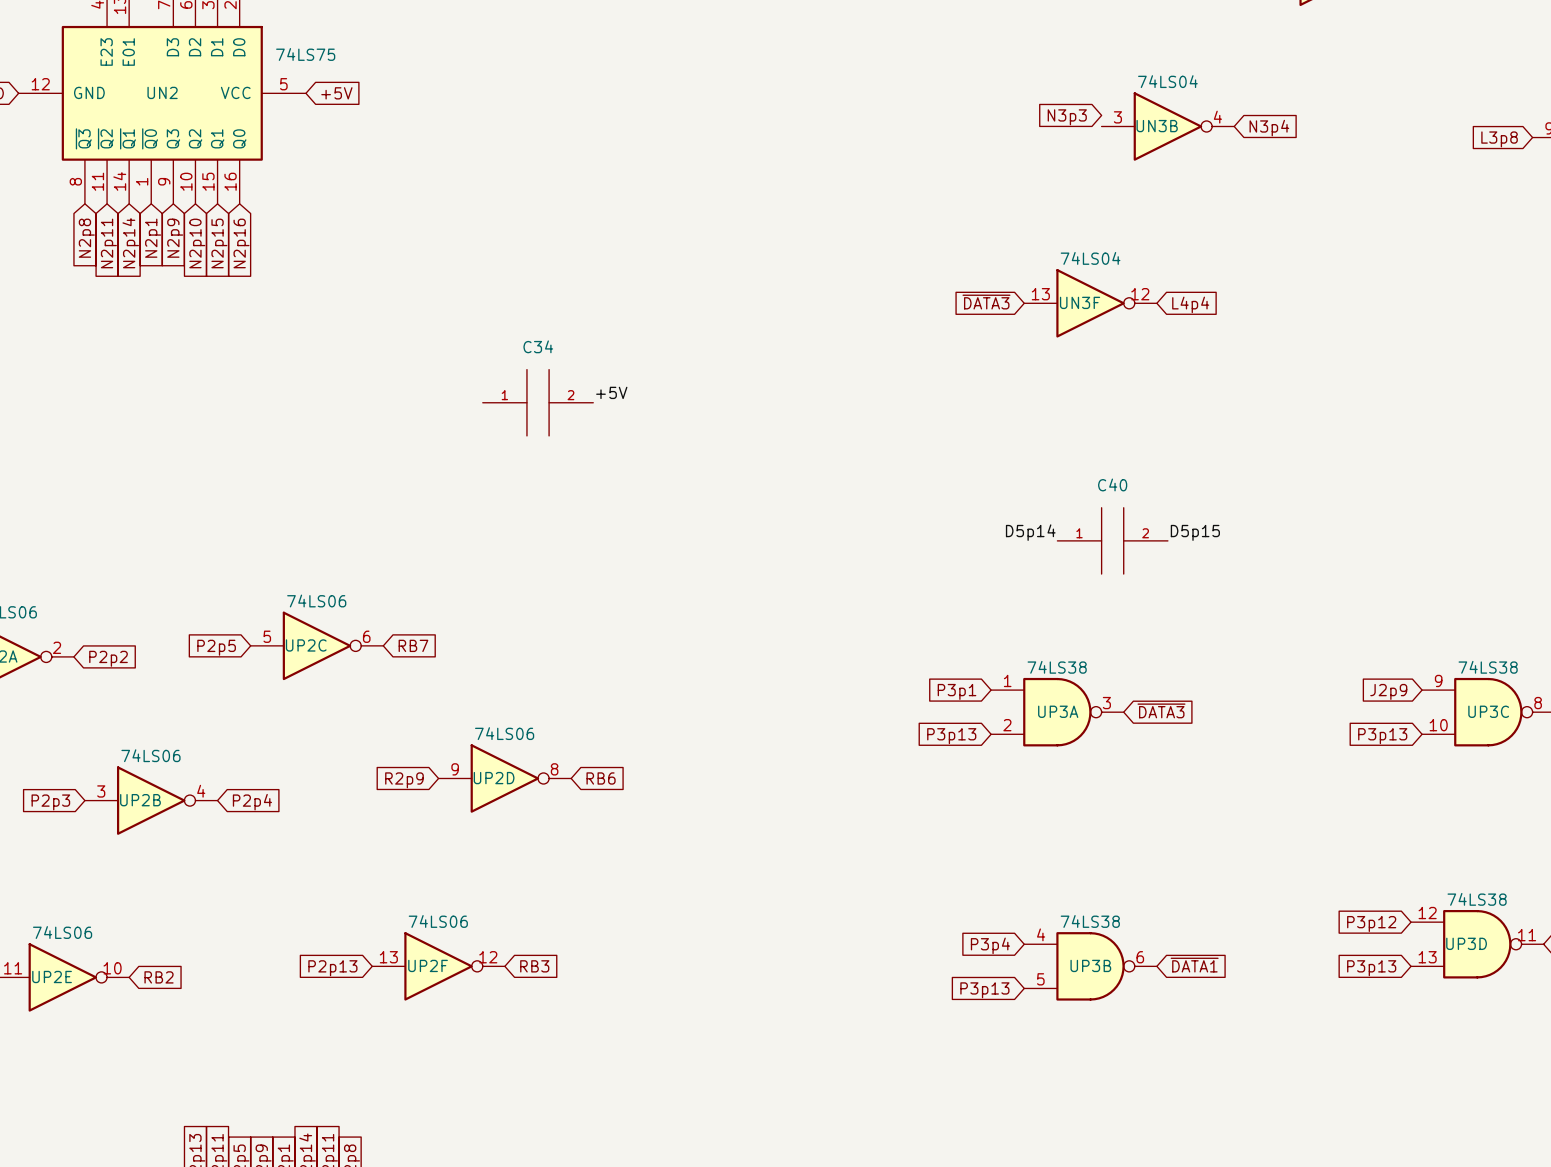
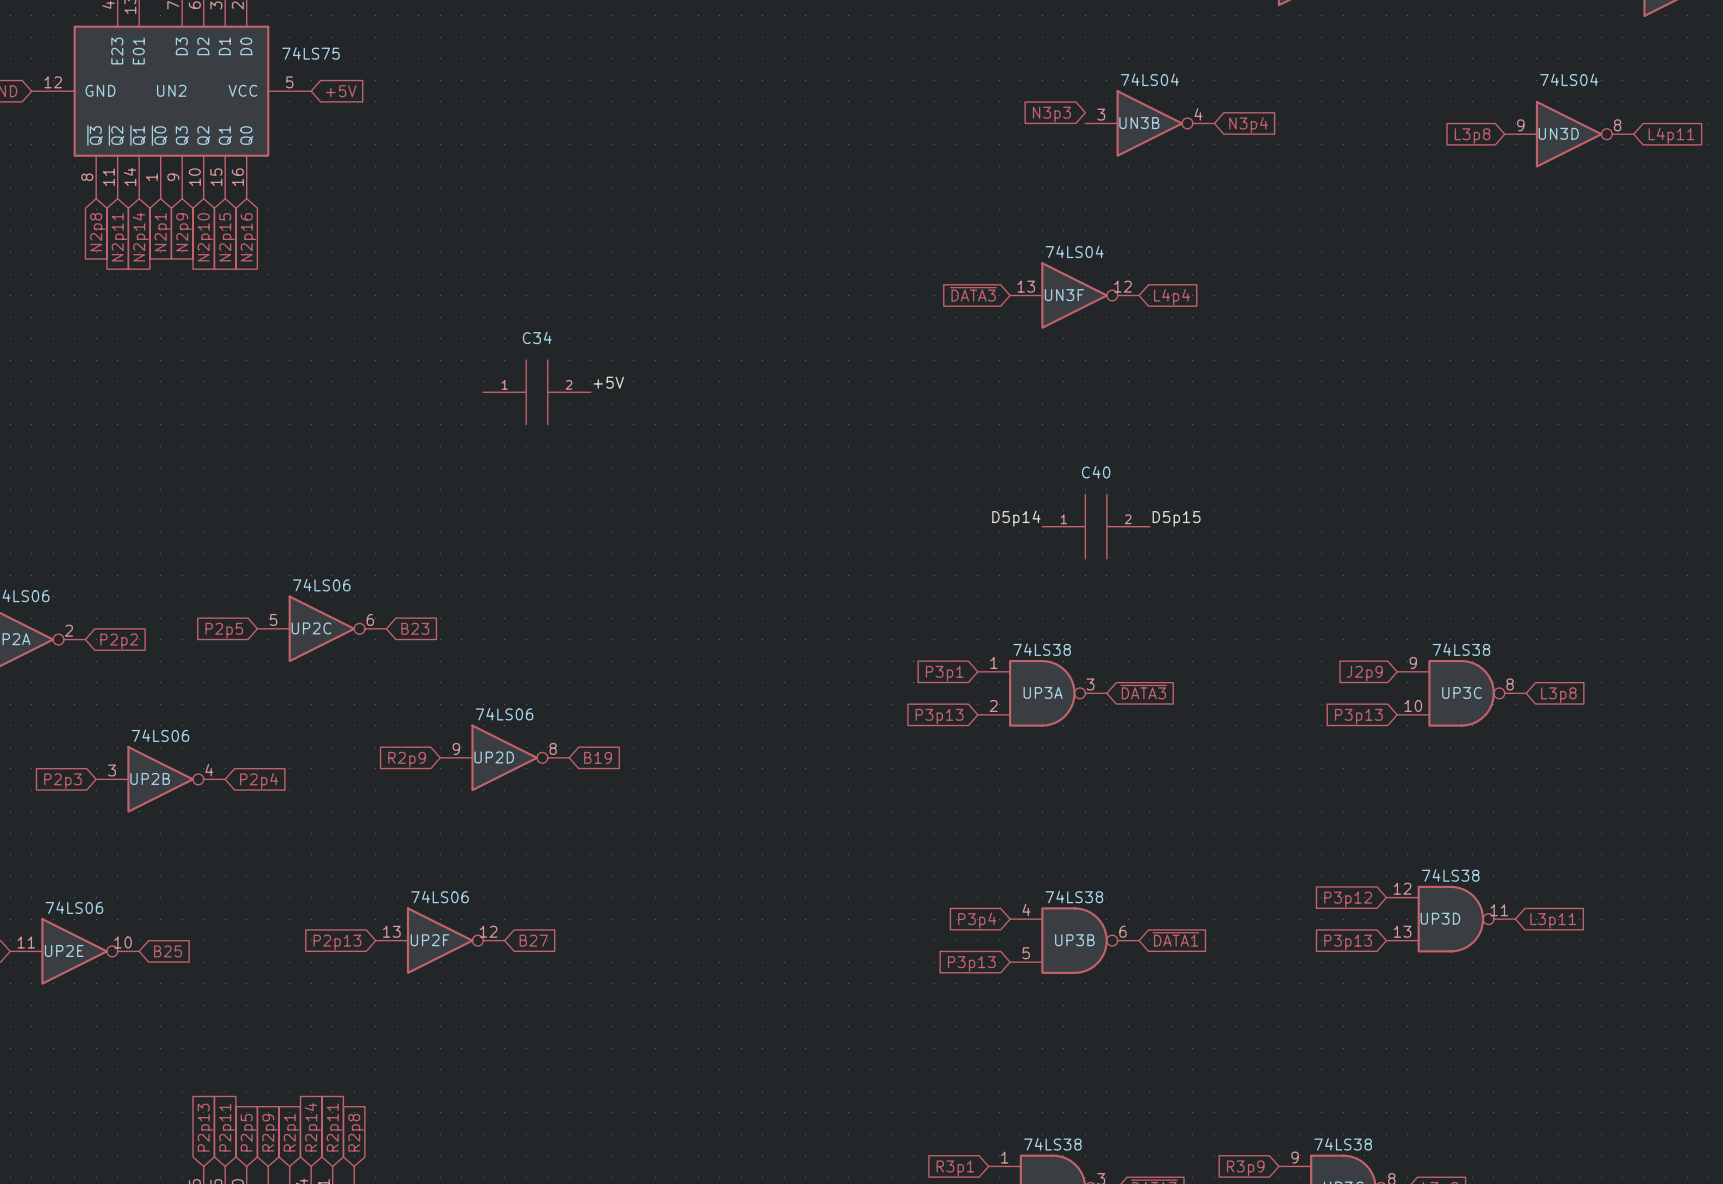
global label: RB7 (413, 645) -> B23 (415, 628)
global label: RB6 (601, 778) -> B19 (598, 757)
global label: RB3 (534, 966) -> B27 (533, 940)
global label: RB2 (159, 977) -> B25 (167, 951)

